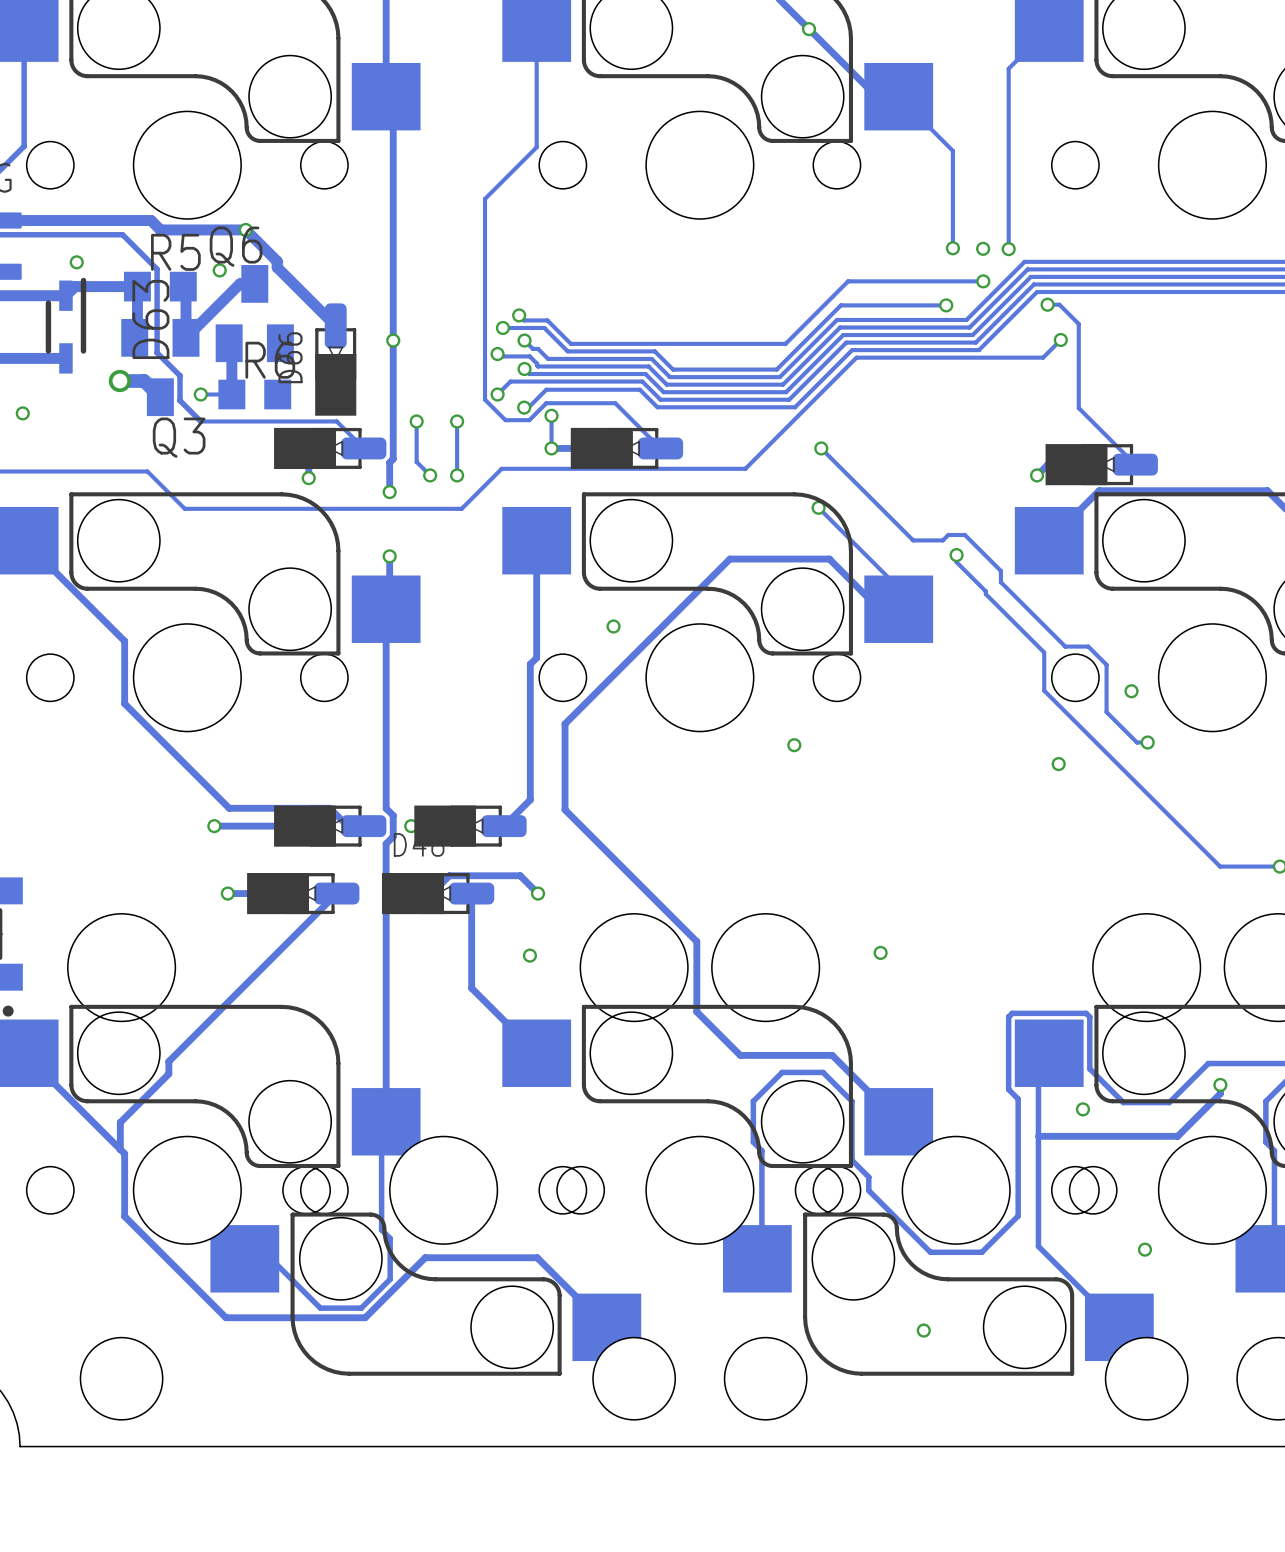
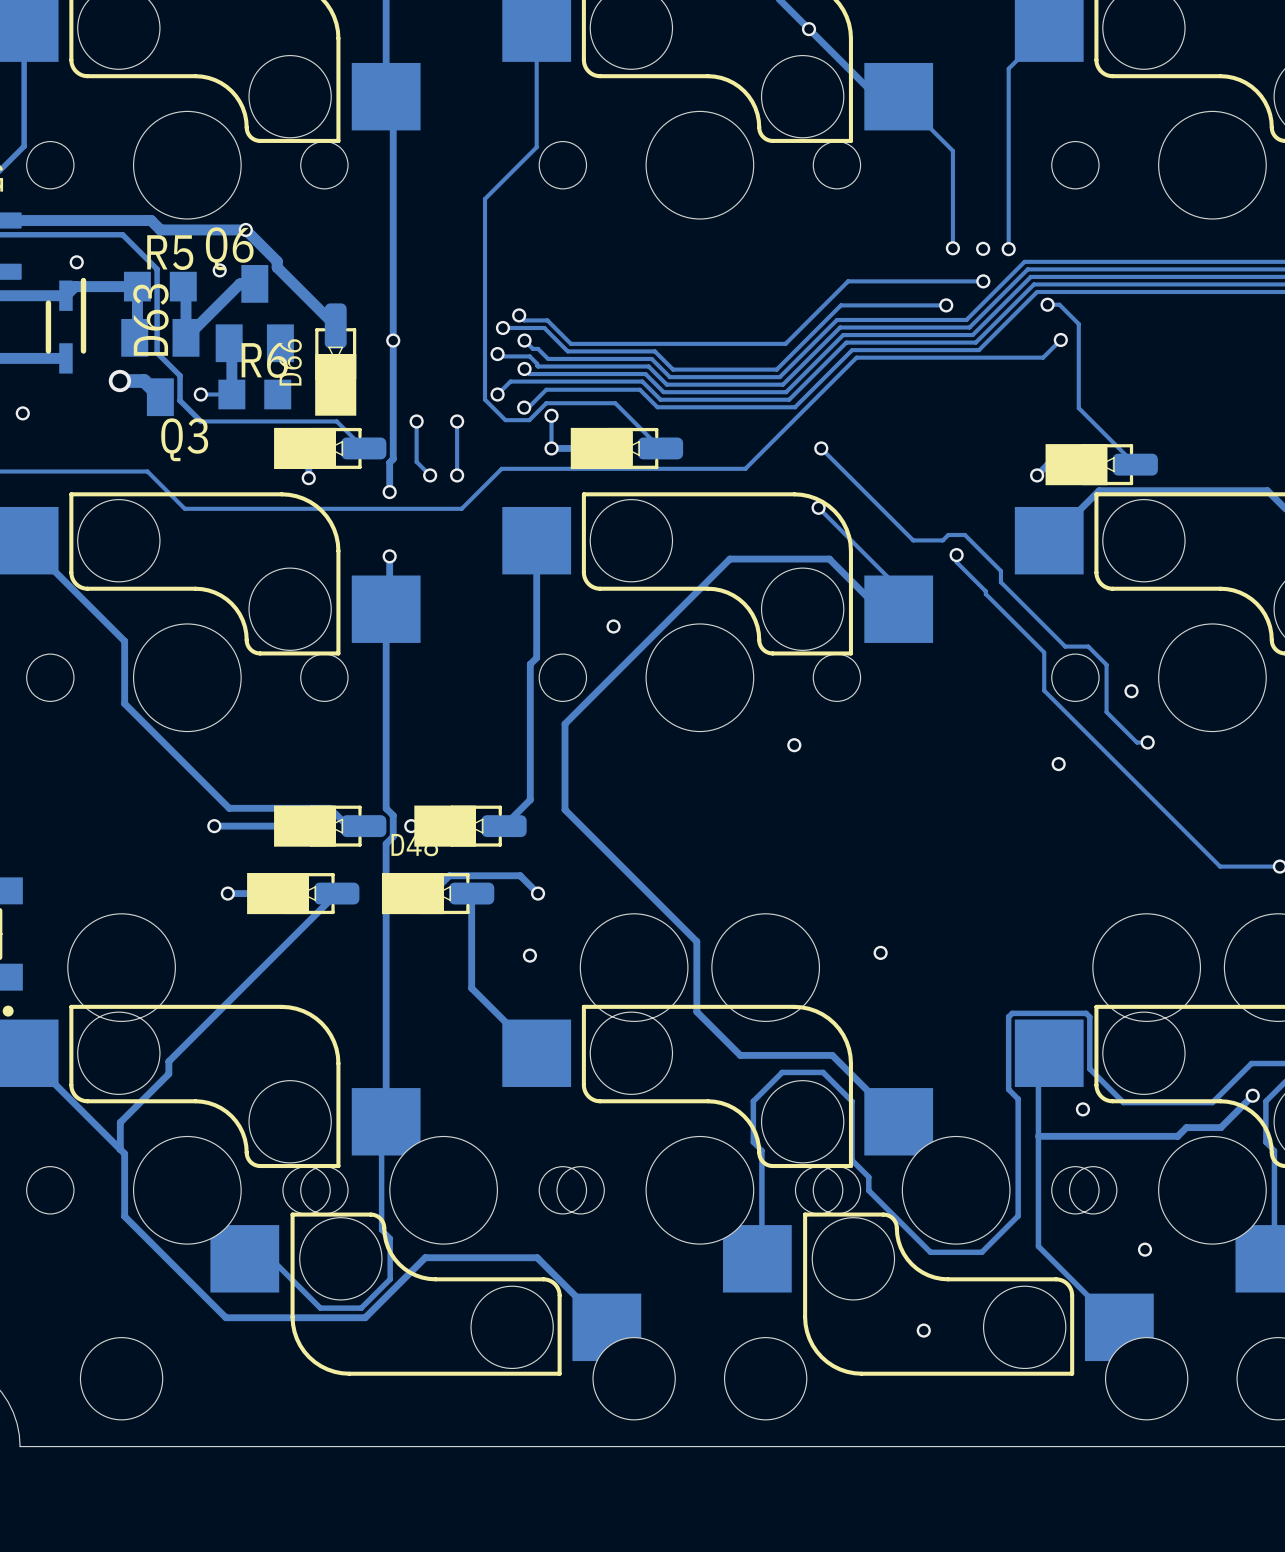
track: (1251, 1063) (1208, 1063) (1169, 1102) -> (1251, 1063) (1212, 1102) (1169, 1102)
track: (1220, 1084) (1220, 1093) (1186, 1127) -> (1252, 1095) (1220, 1127) (1186, 1127)
via position: (1220, 1084) -> (1252, 1095)

